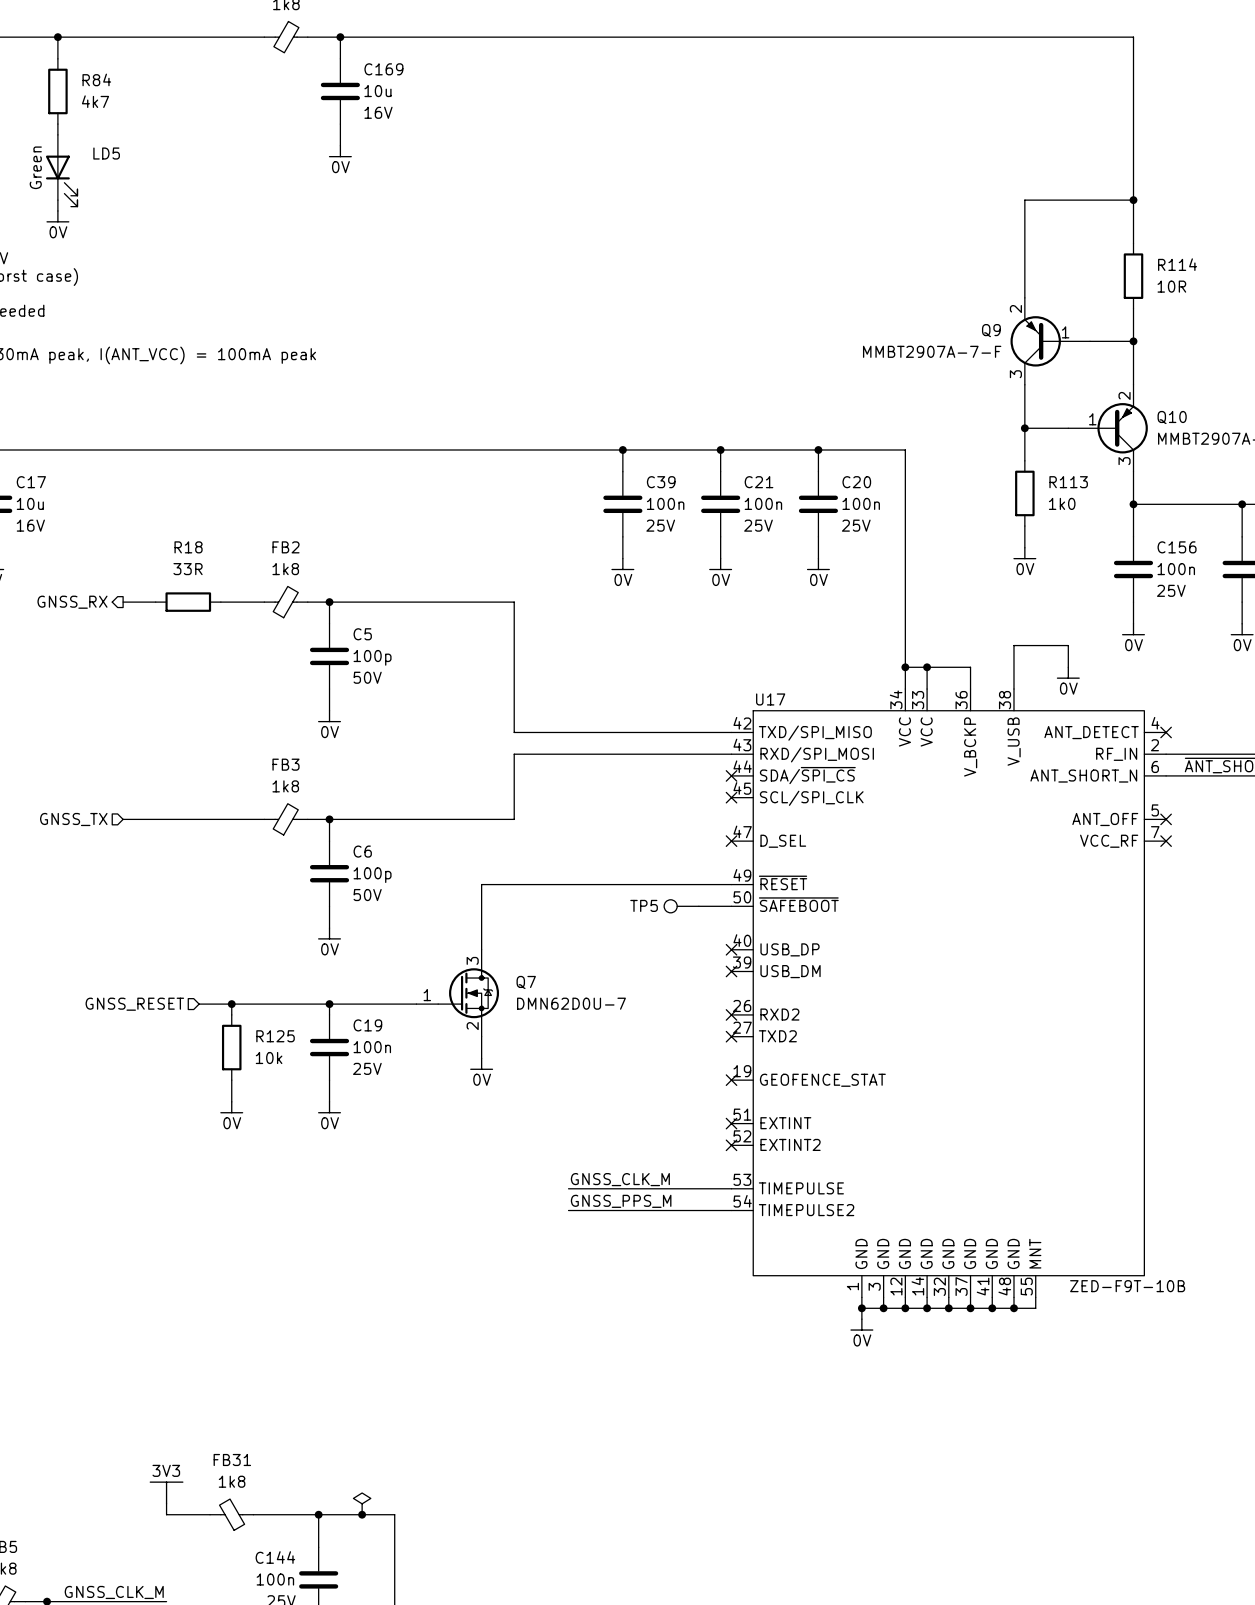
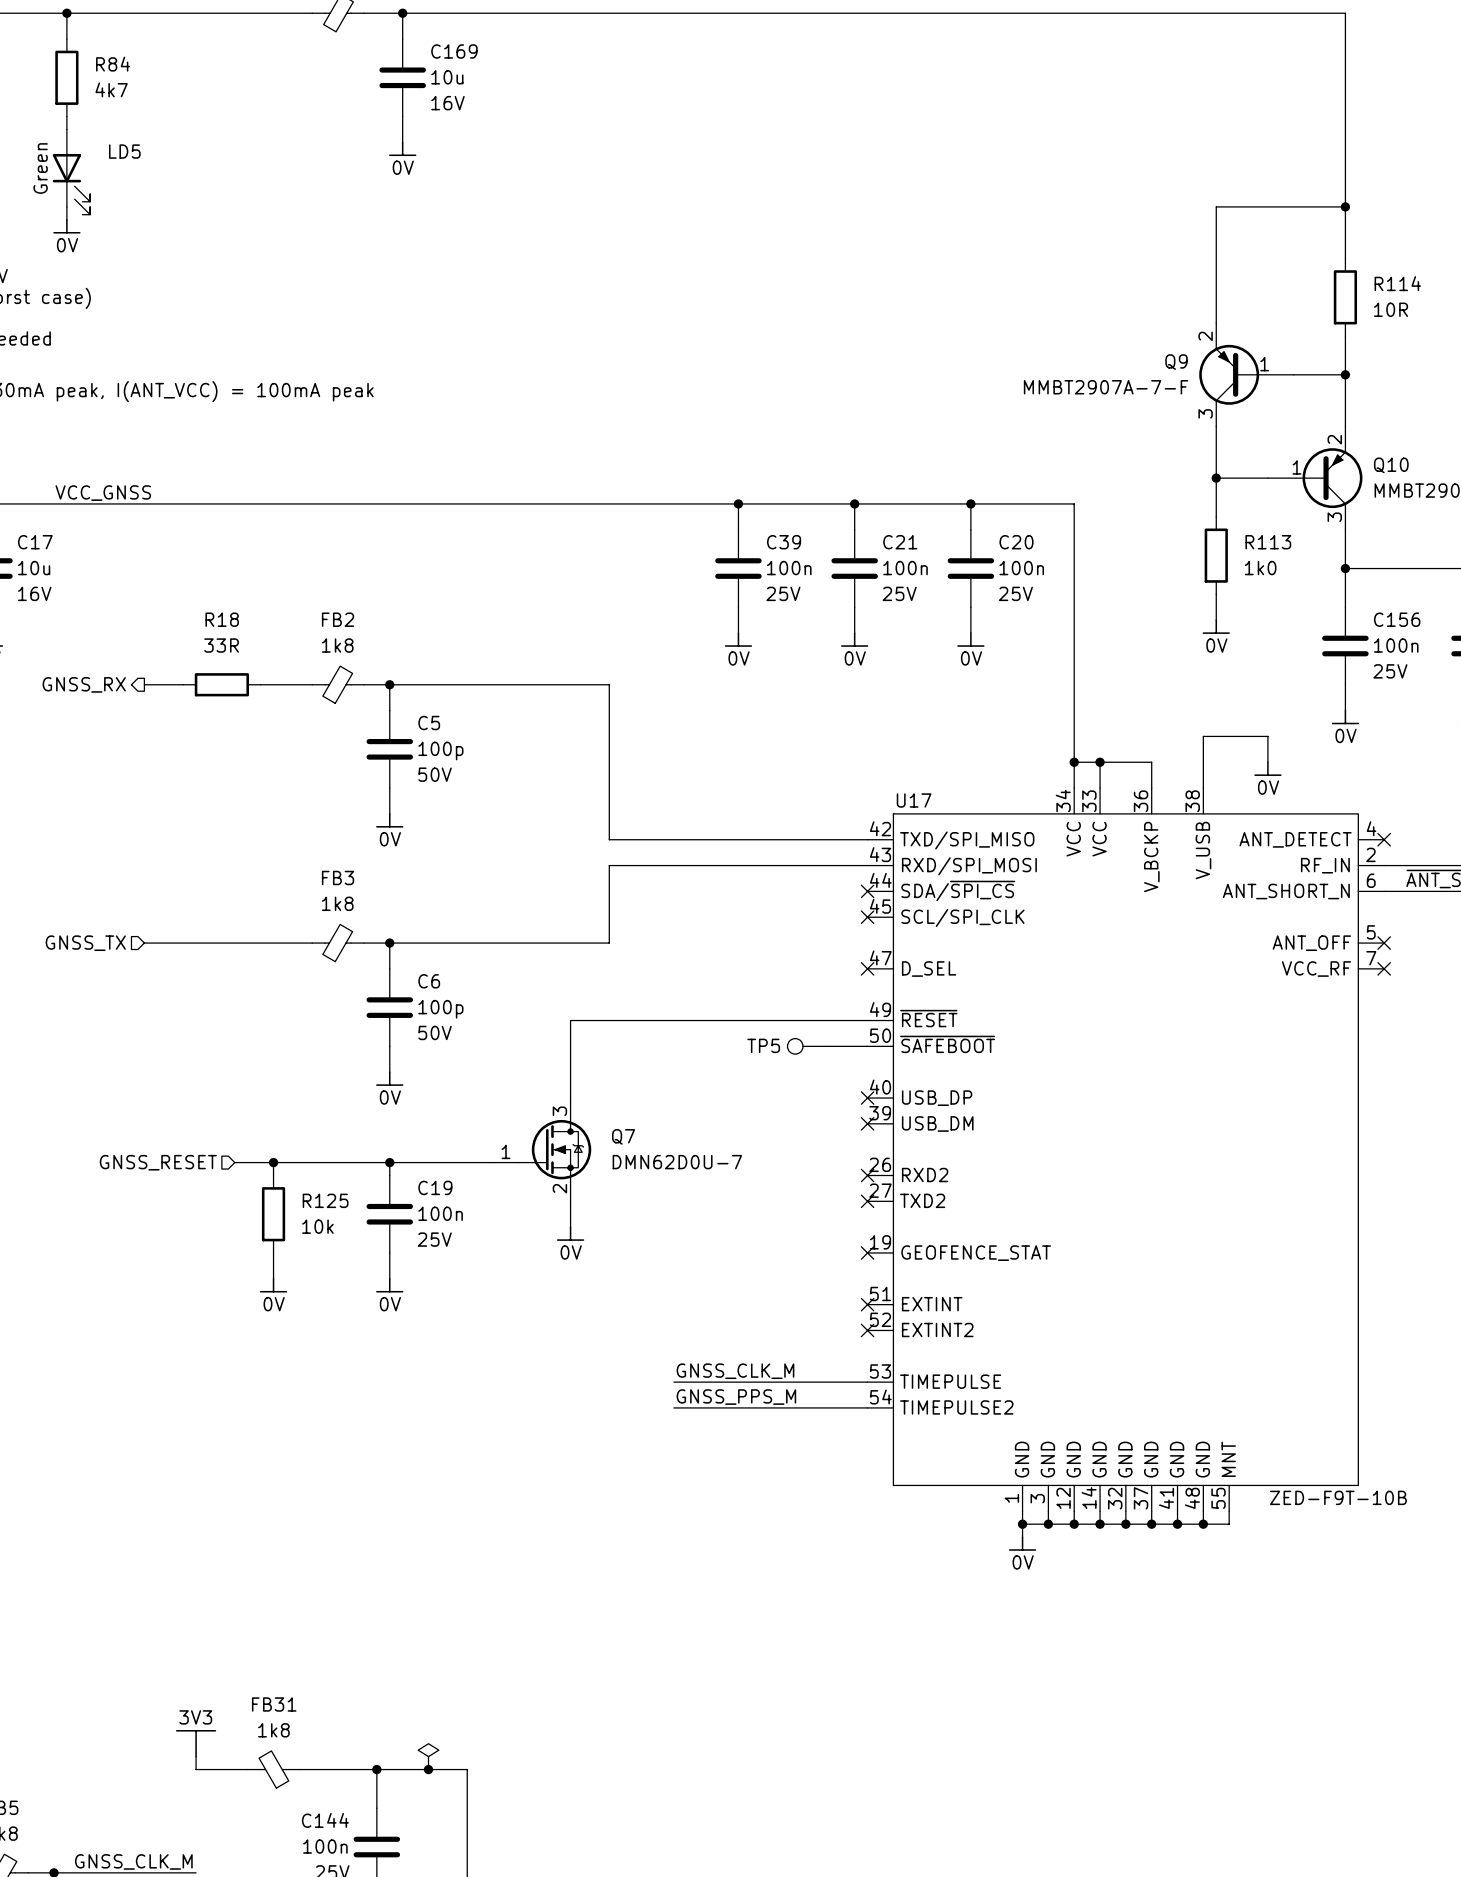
label: none -> VCC_GNSS (103, 493)

